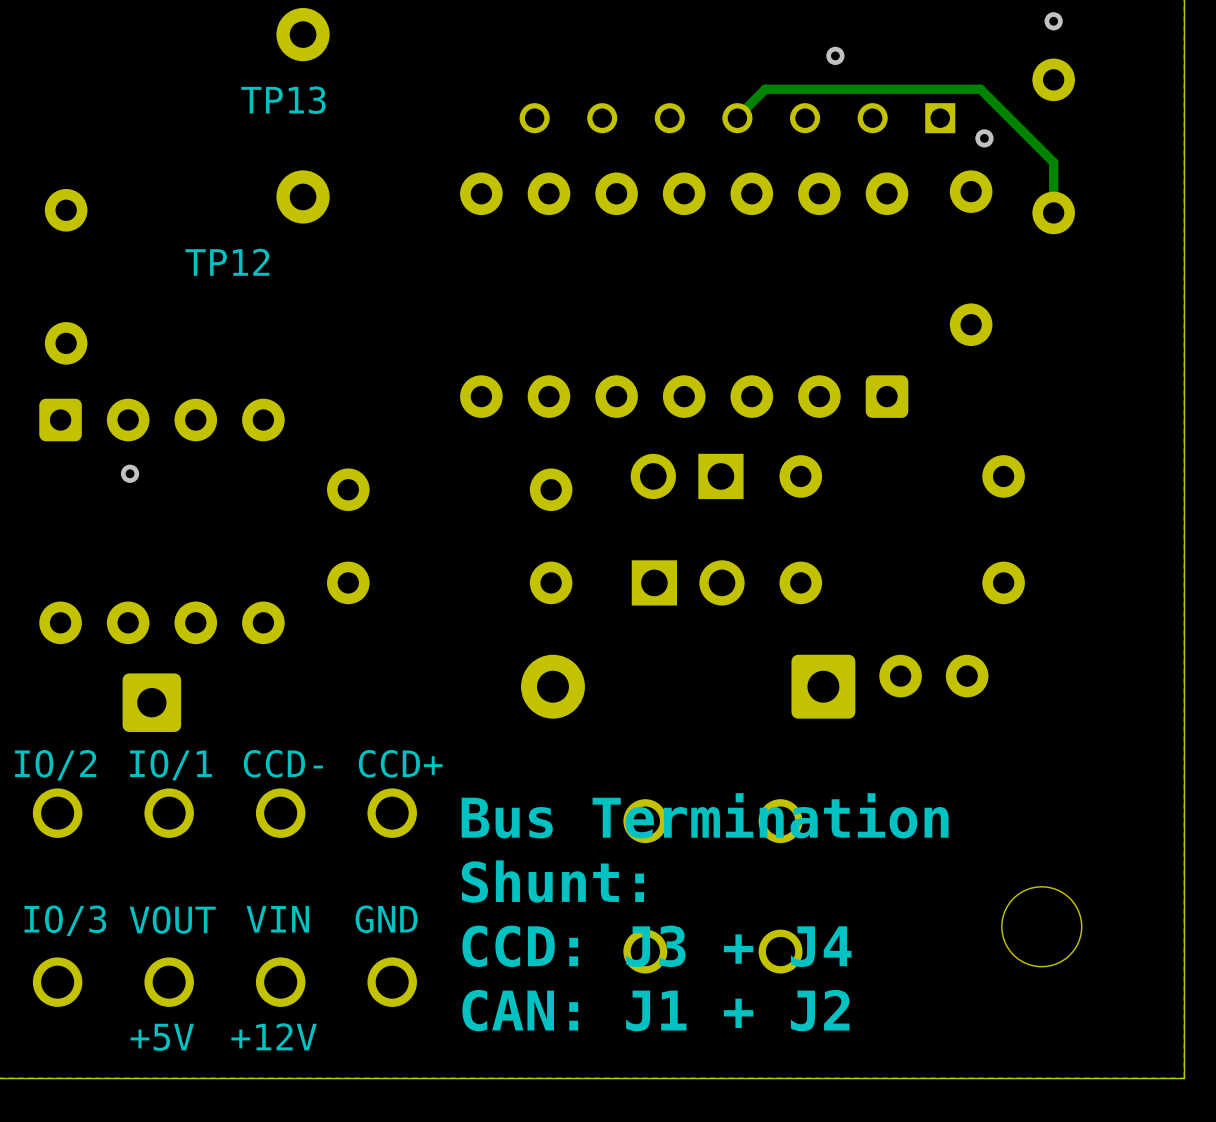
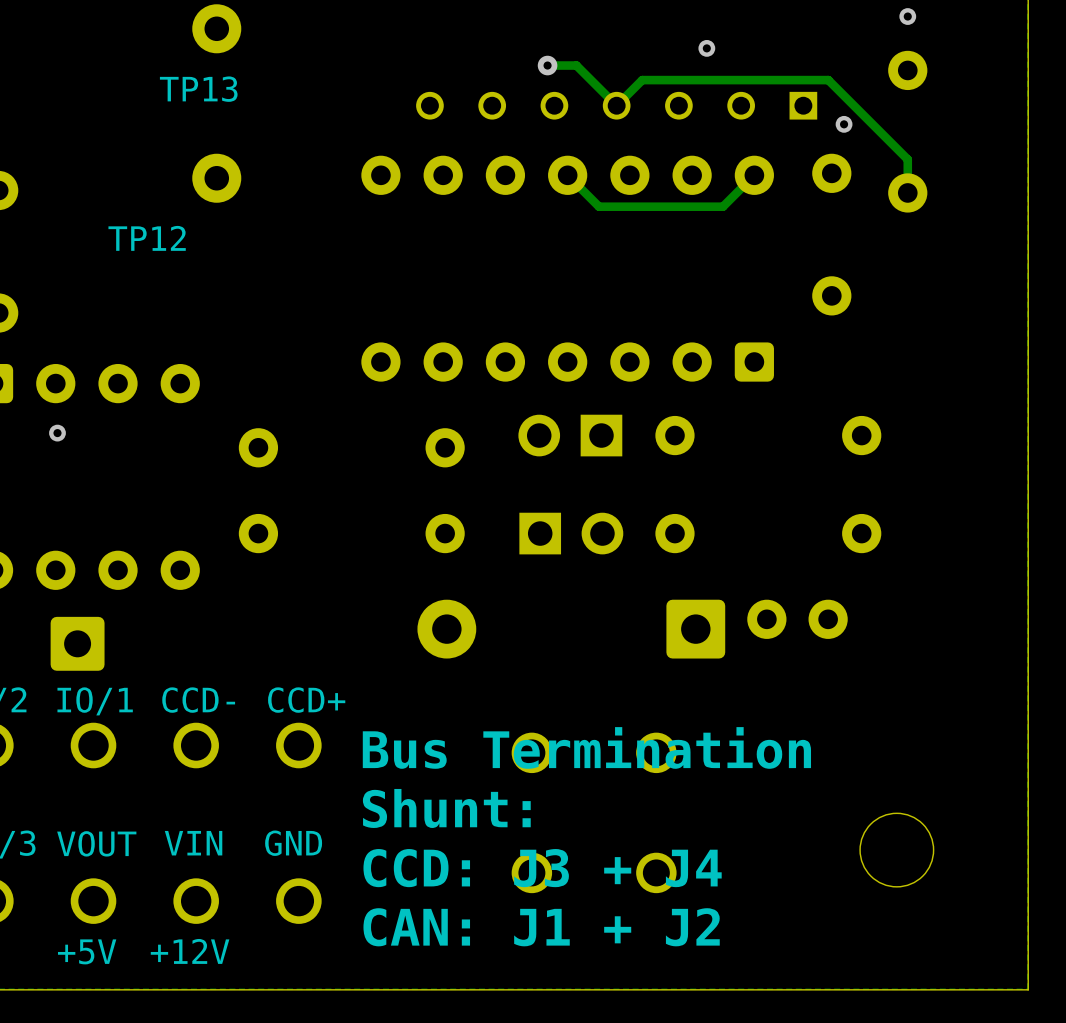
via: none -> (547, 65)
track: (737, 117) (765, 89) (980, 89) (1053, 162) (1053, 176) -> (547, 65) (576, 65) (616, 105) (642, 80) (828, 80) (907, 159)
track: none -> (754, 175) (722, 206) (599, 206) (567, 175)

